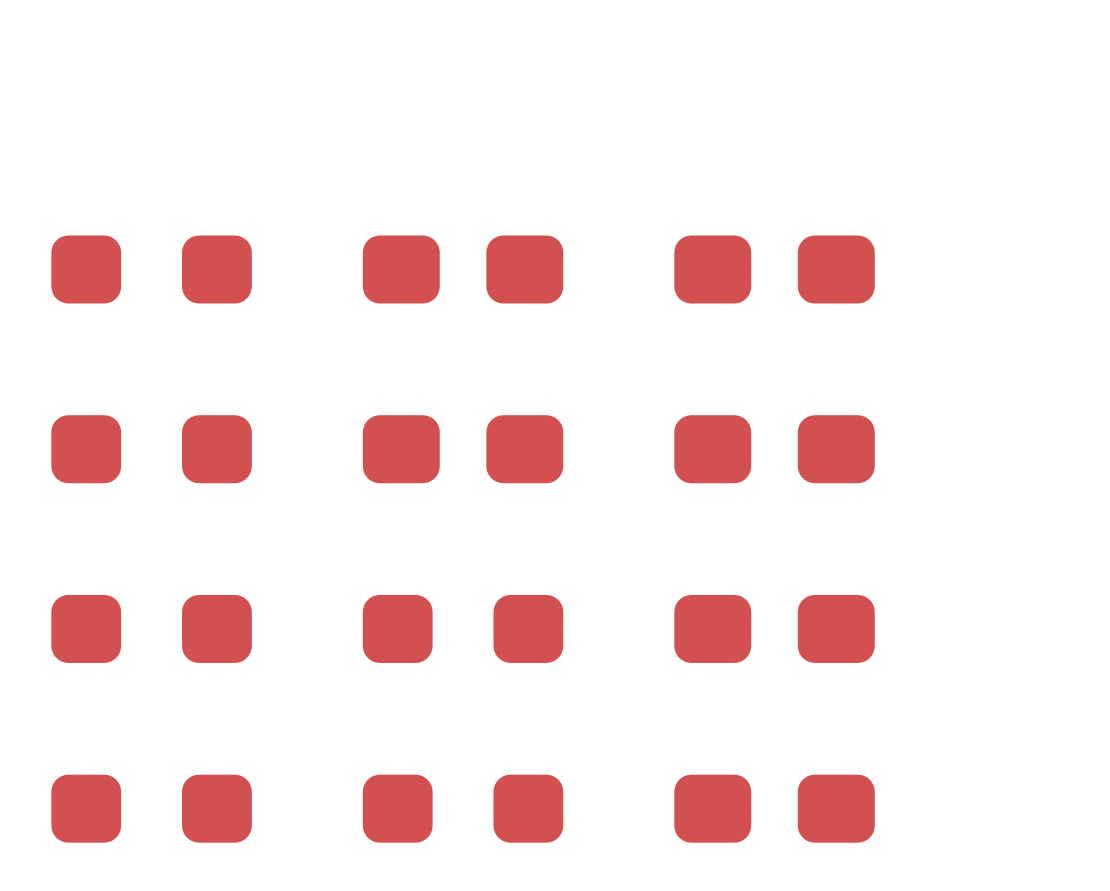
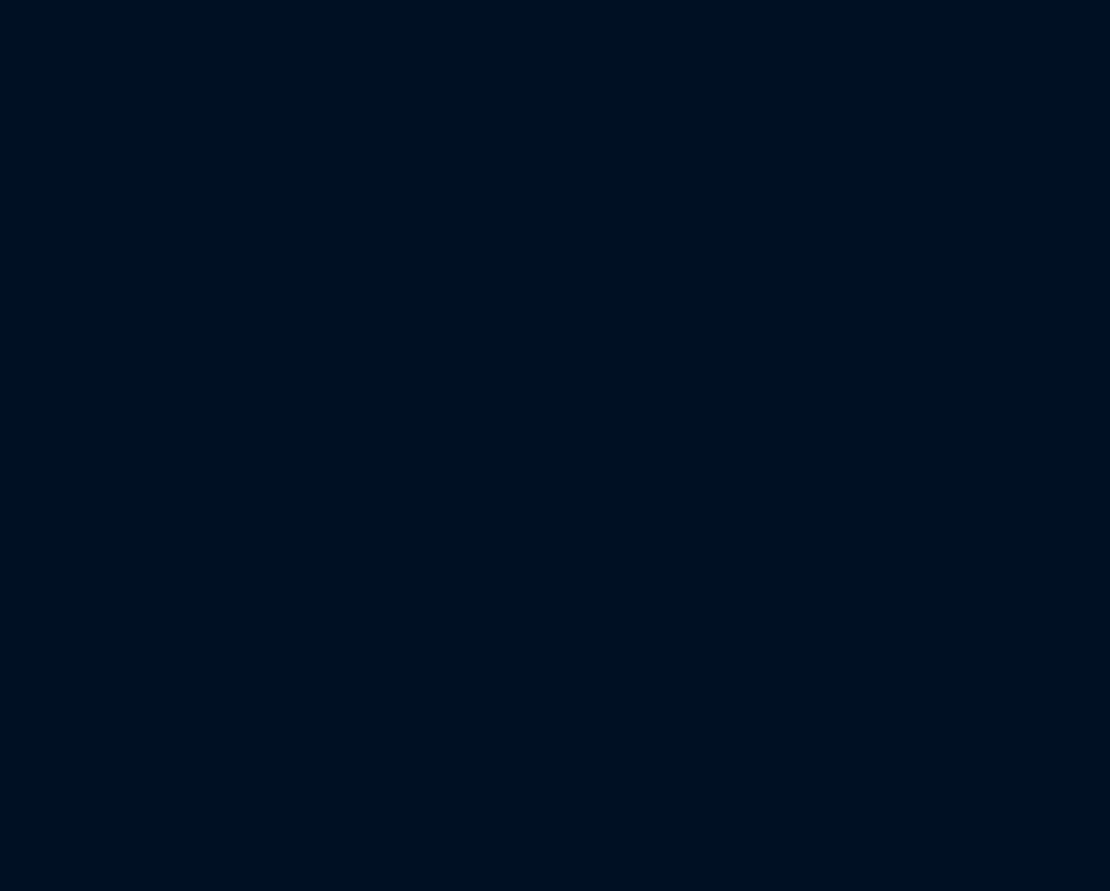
part: (151, 269) -> none
part: (463, 269) -> none
part: (774, 269) -> none
part: (151, 449) -> none
part: (463, 449) -> none
part: (774, 449) -> none
part: (151, 628) -> none
part: (463, 628) -> none
part: (774, 628) -> none
part: (151, 808) -> none
part: (463, 808) -> none
part: (774, 808) -> none

